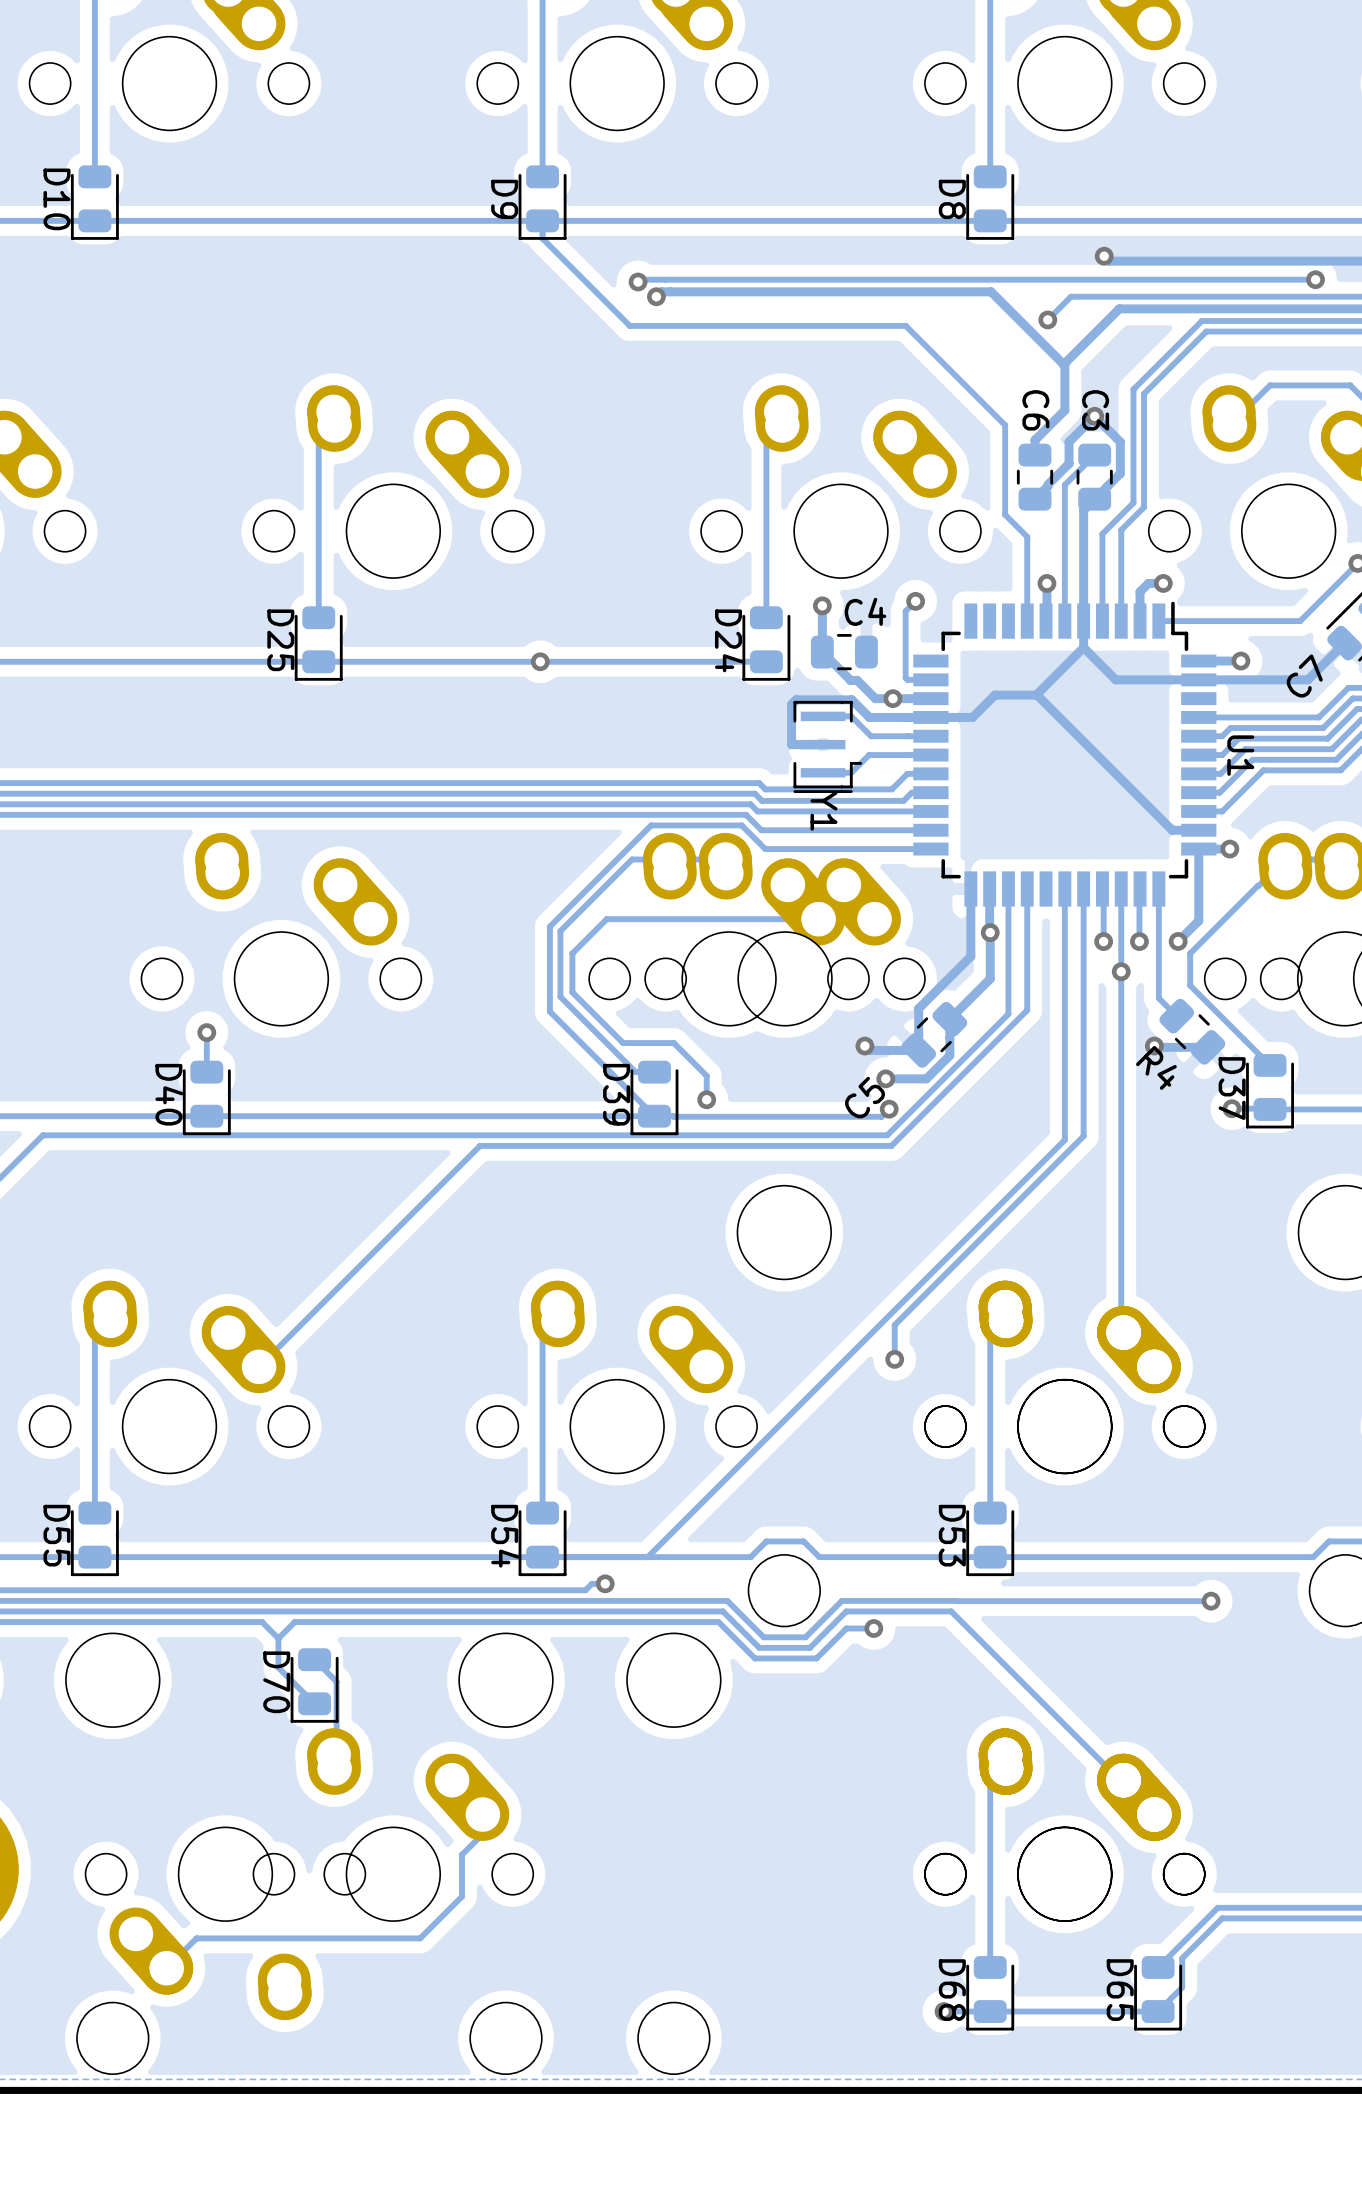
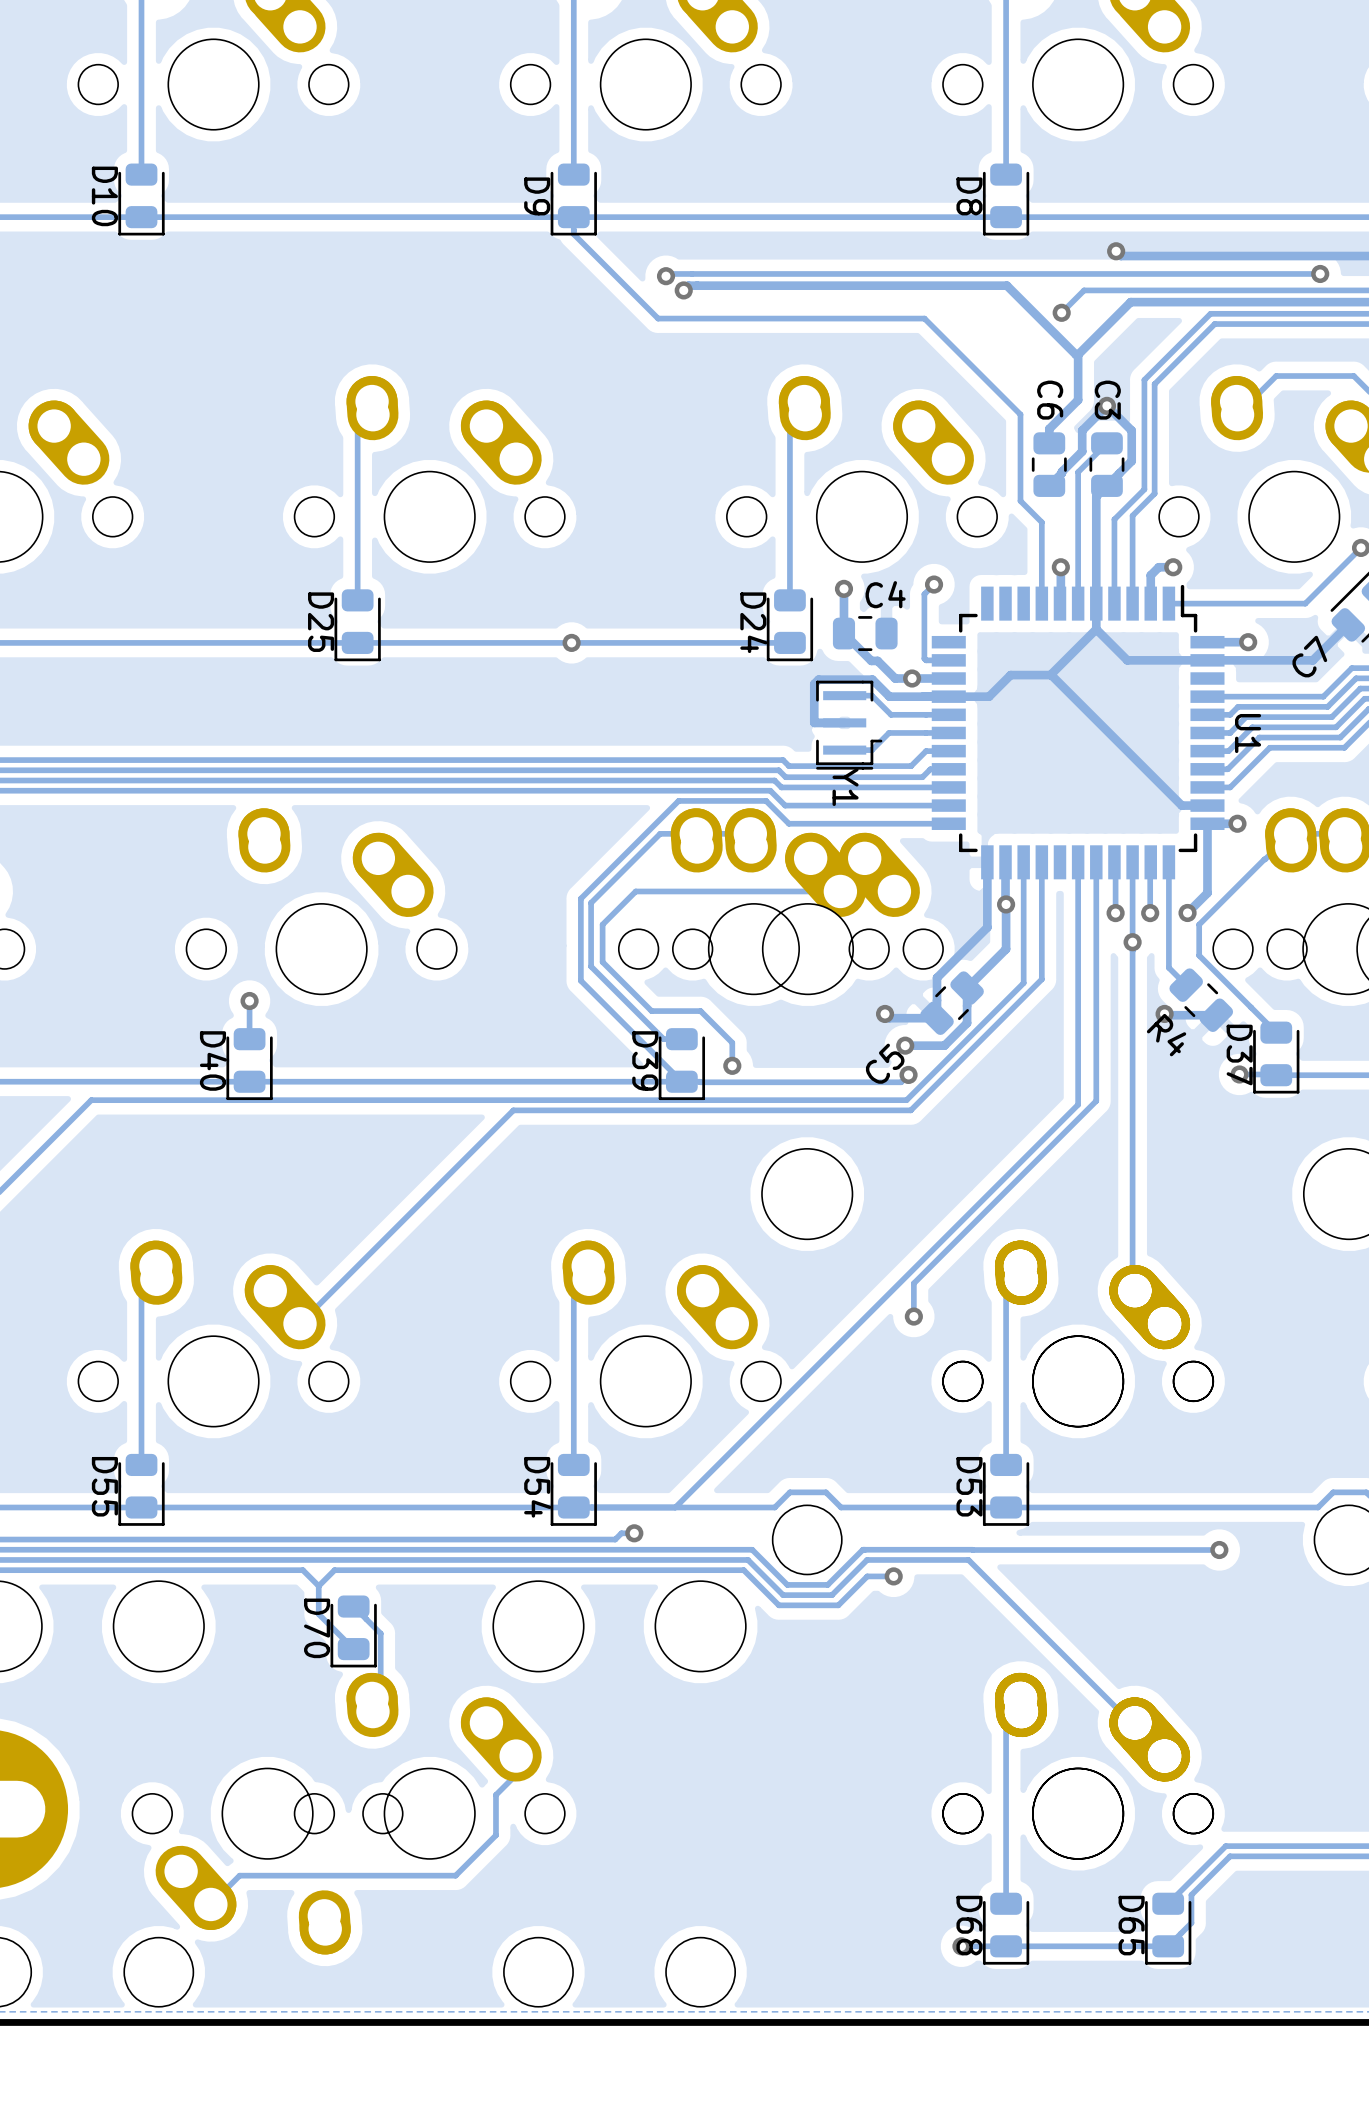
track: (336, 1681) (336, 1751) -> (374, 1627) (380, 1633) (380, 1703) (372, 1711)

